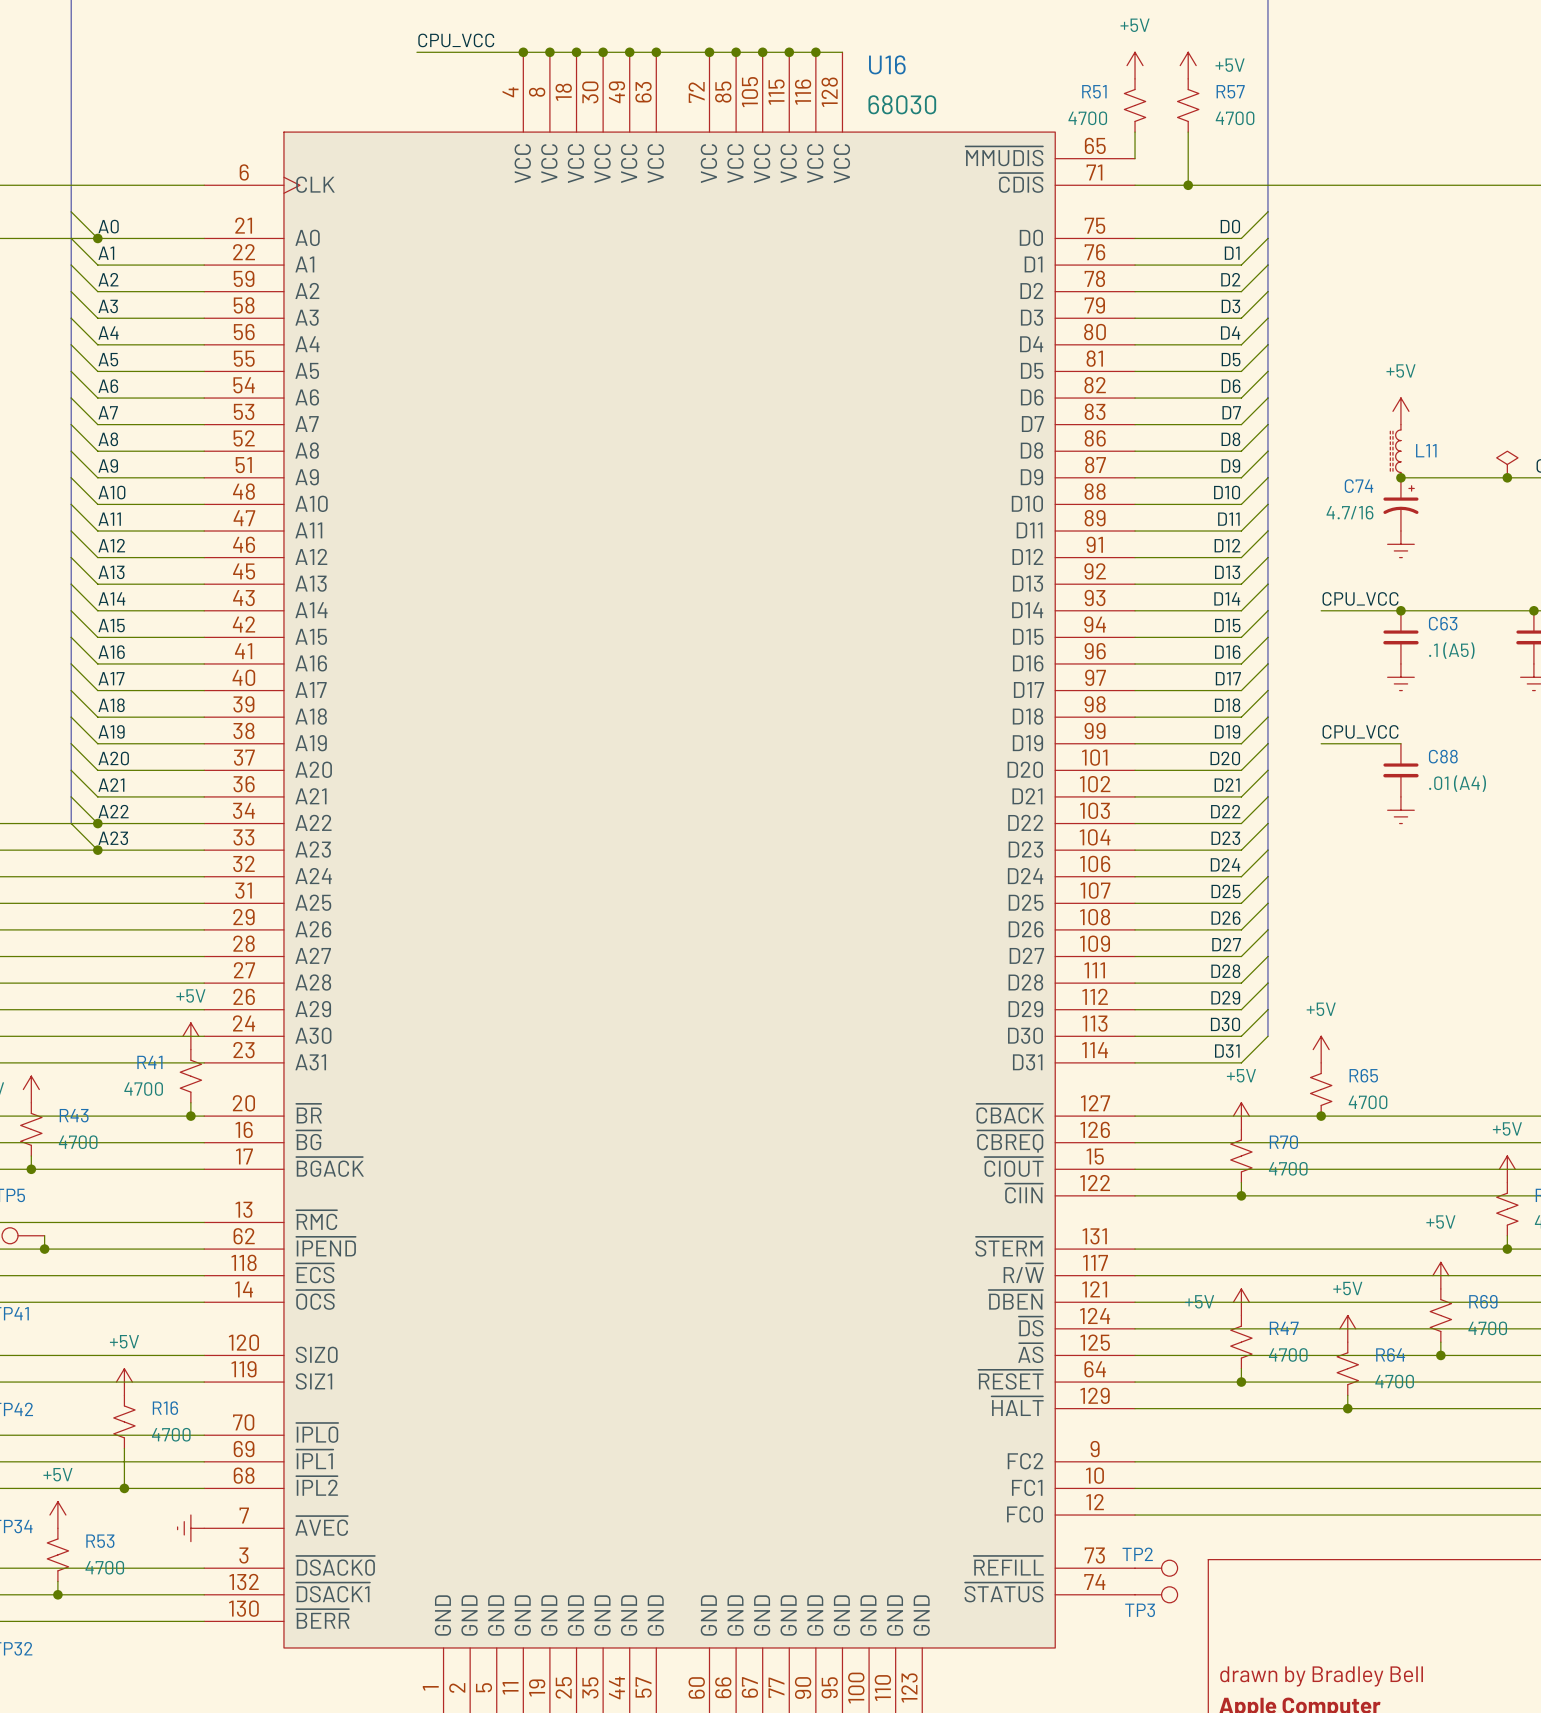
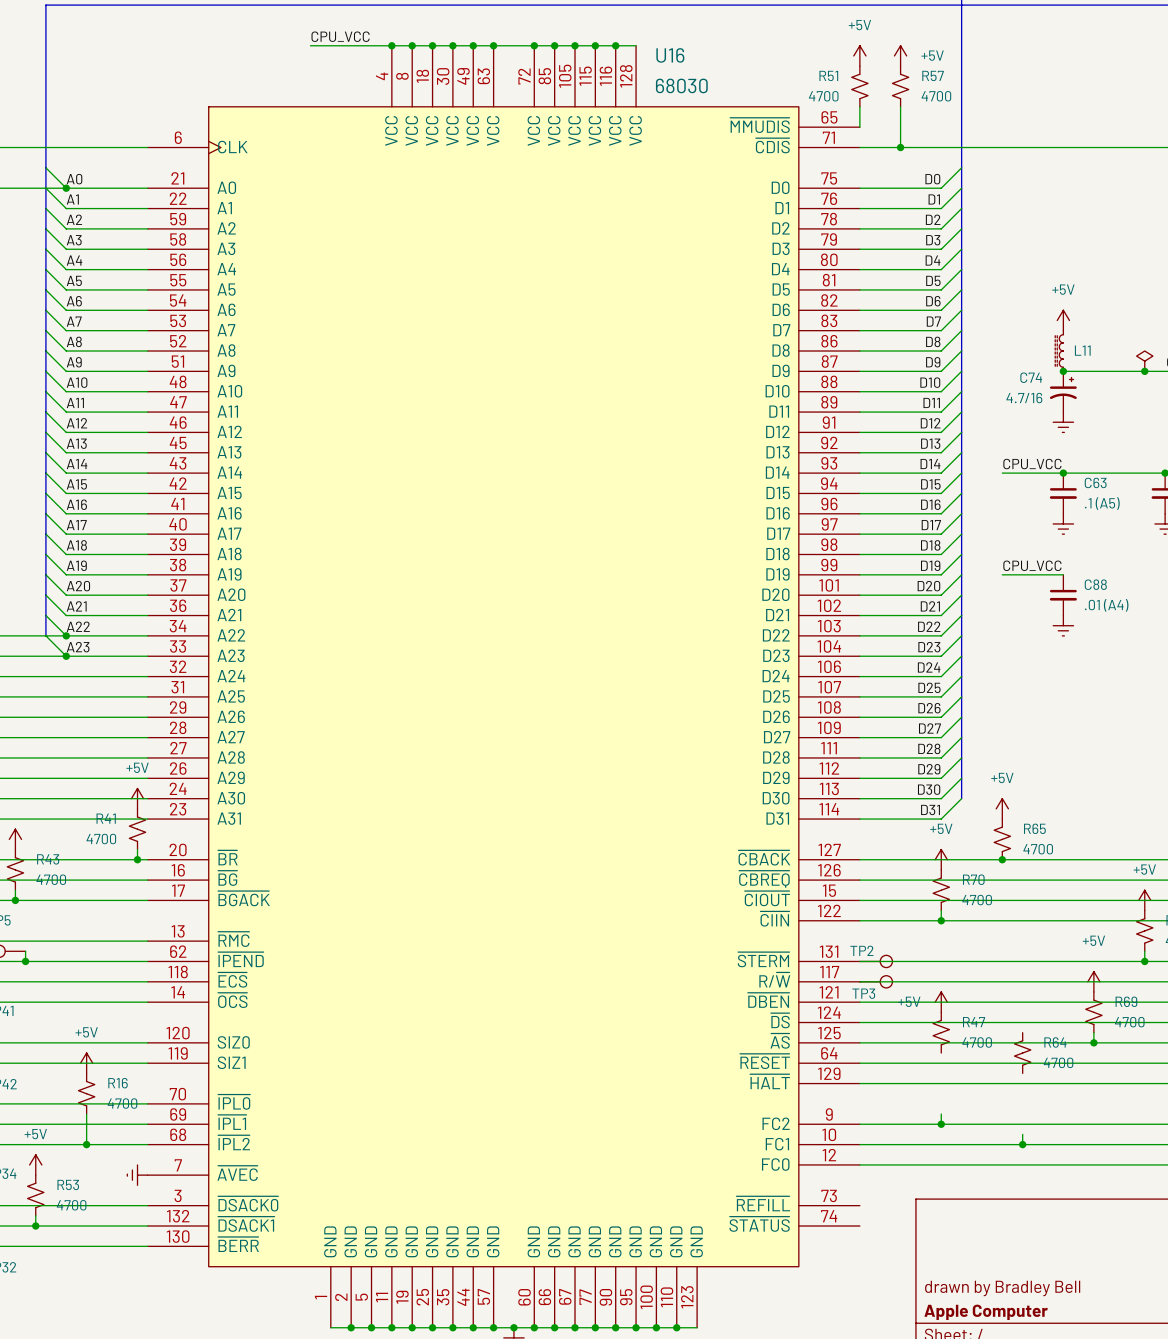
power symbol: +5V (1347, 1328) -> none
wire: (1241, 1368) (1241, 1382) -> (941, 1114) (941, 1124)
junction: (1241, 1382) -> none
wire: (1347, 1395) (1347, 1408) -> (1022, 1134) (1022, 1144)
junction: (1347, 1408) -> none
junction: none -> (941, 1124)
junction: none -> (1022, 1144)
TP2 position: (1156, 1568) -> (876, 961)
TP3 position: (1156, 1594) -> (876, 981)

